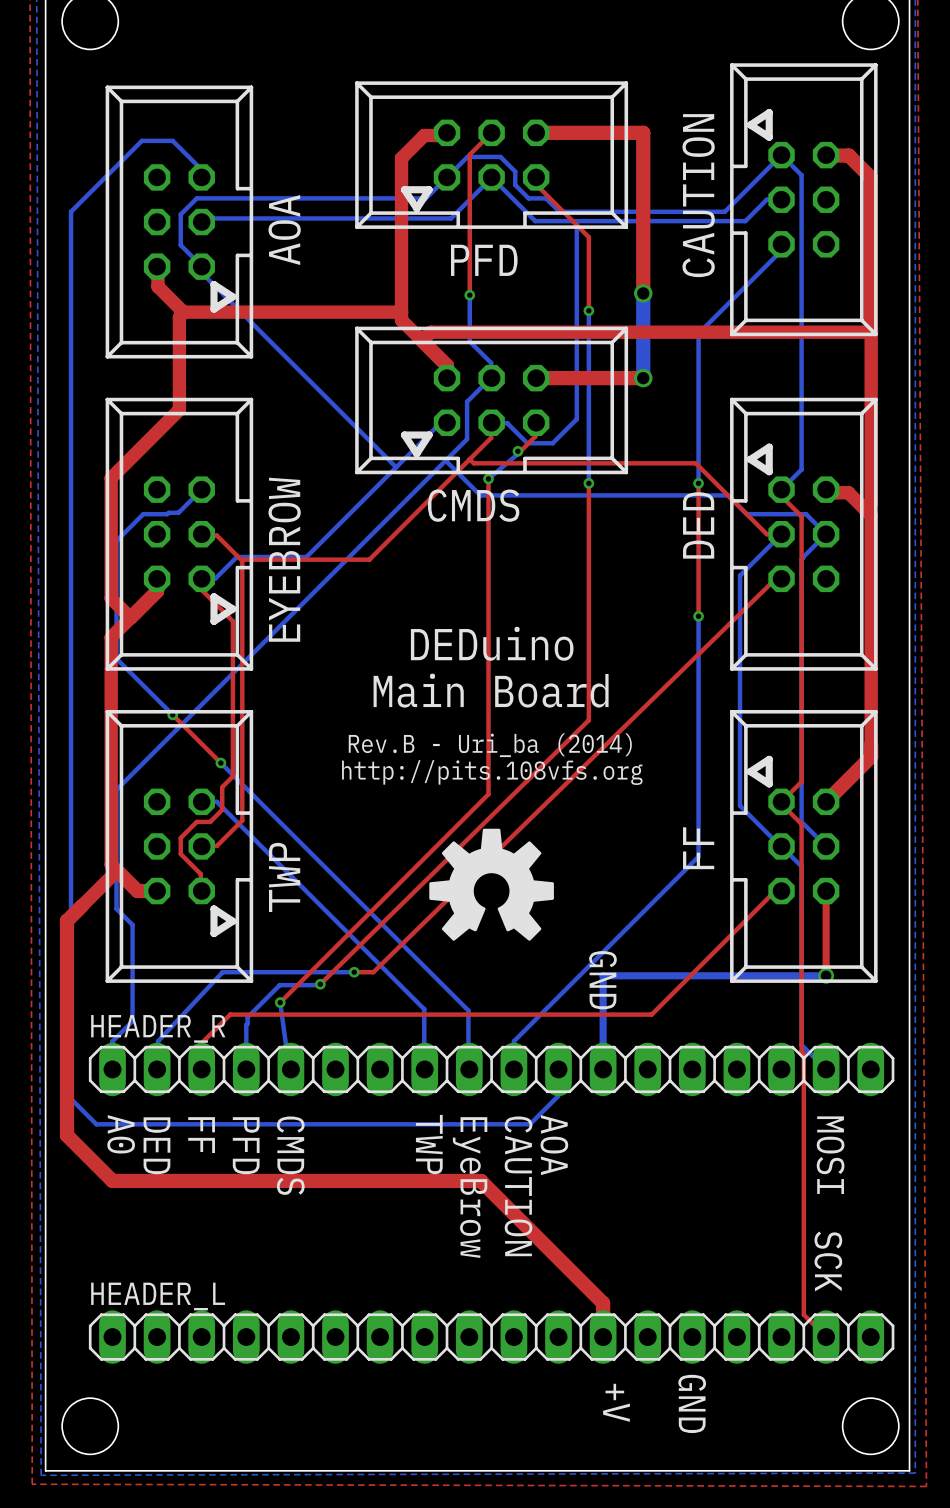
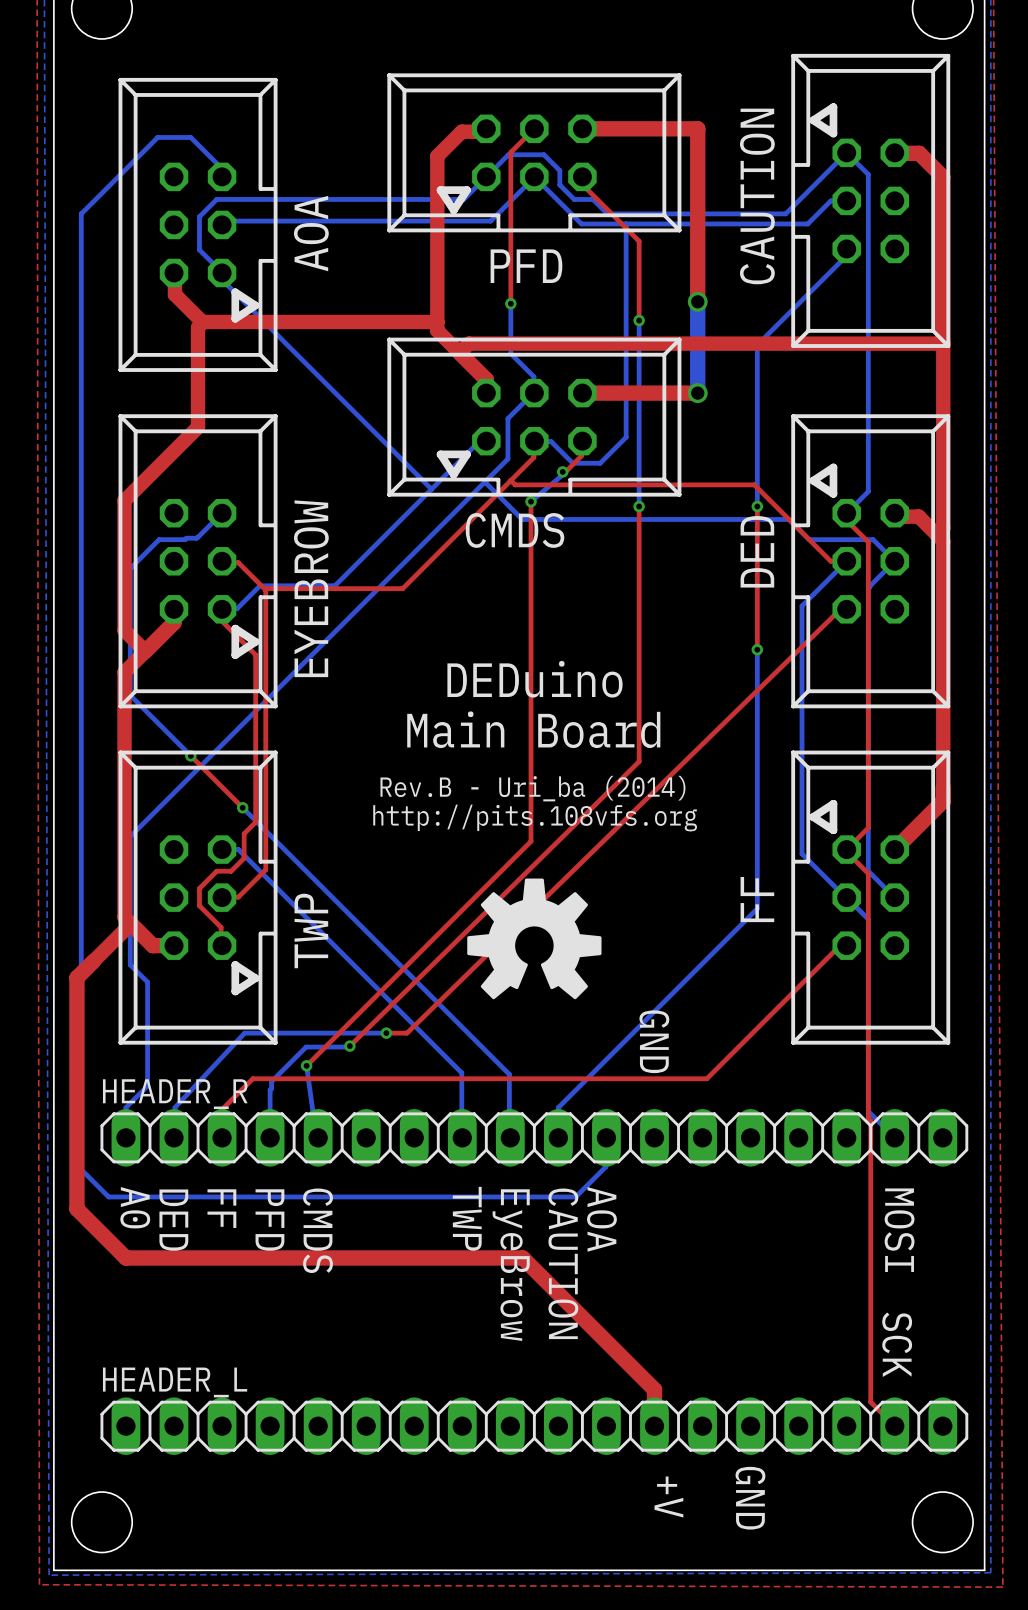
top track: (826, 891) (826, 975) -> none
bottom track: (826, 975) (603, 975) (603, 1069) -> none
via: (826, 975) -> none

